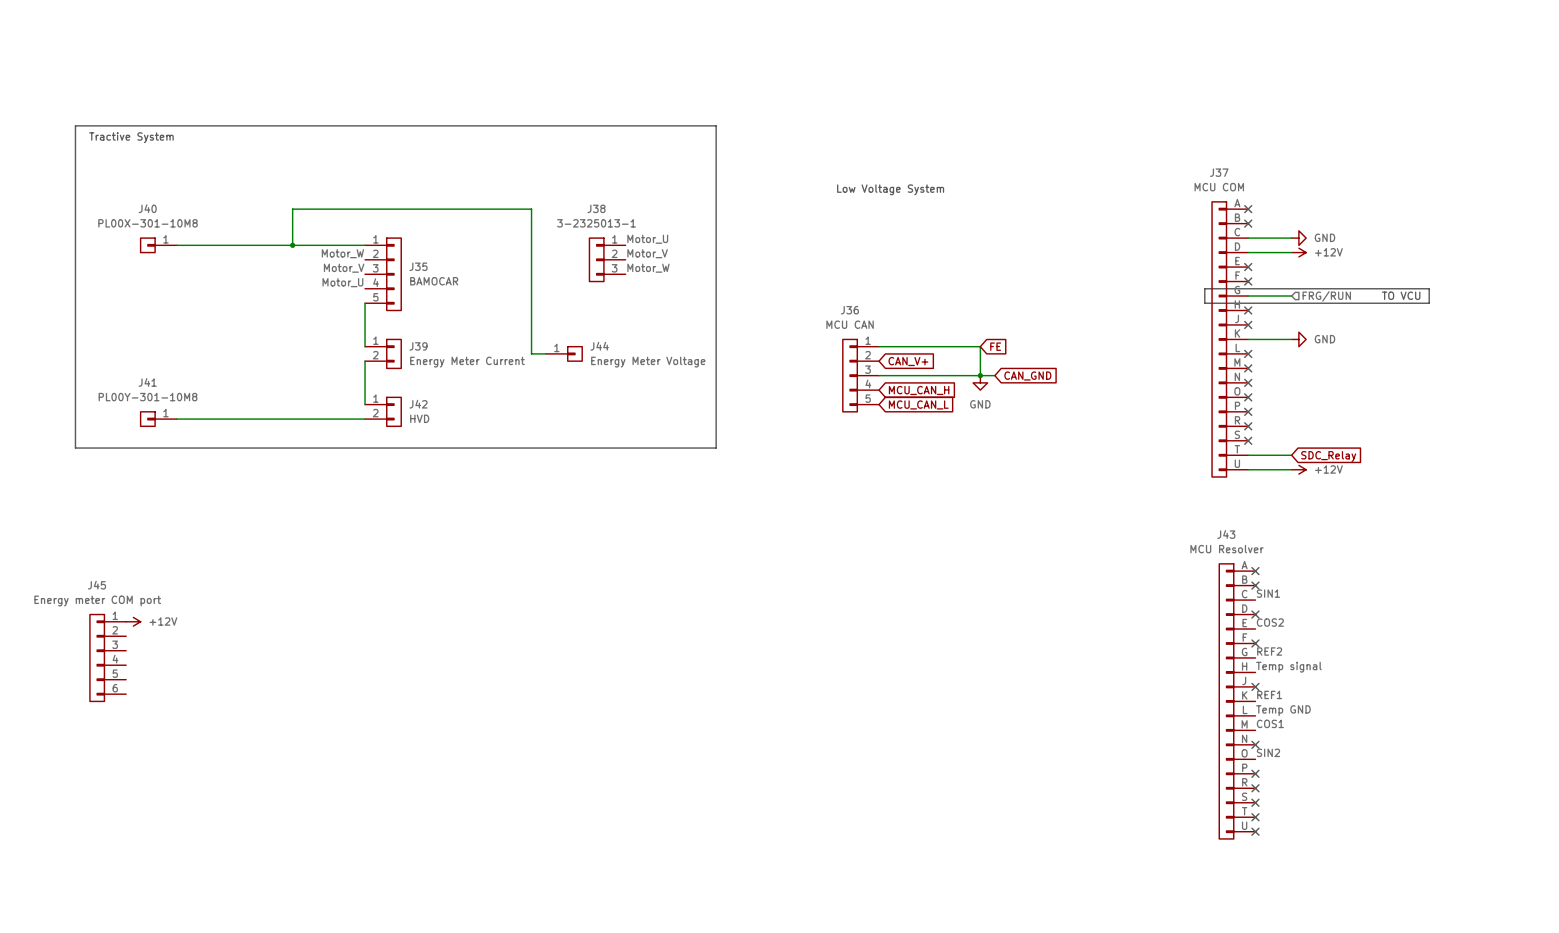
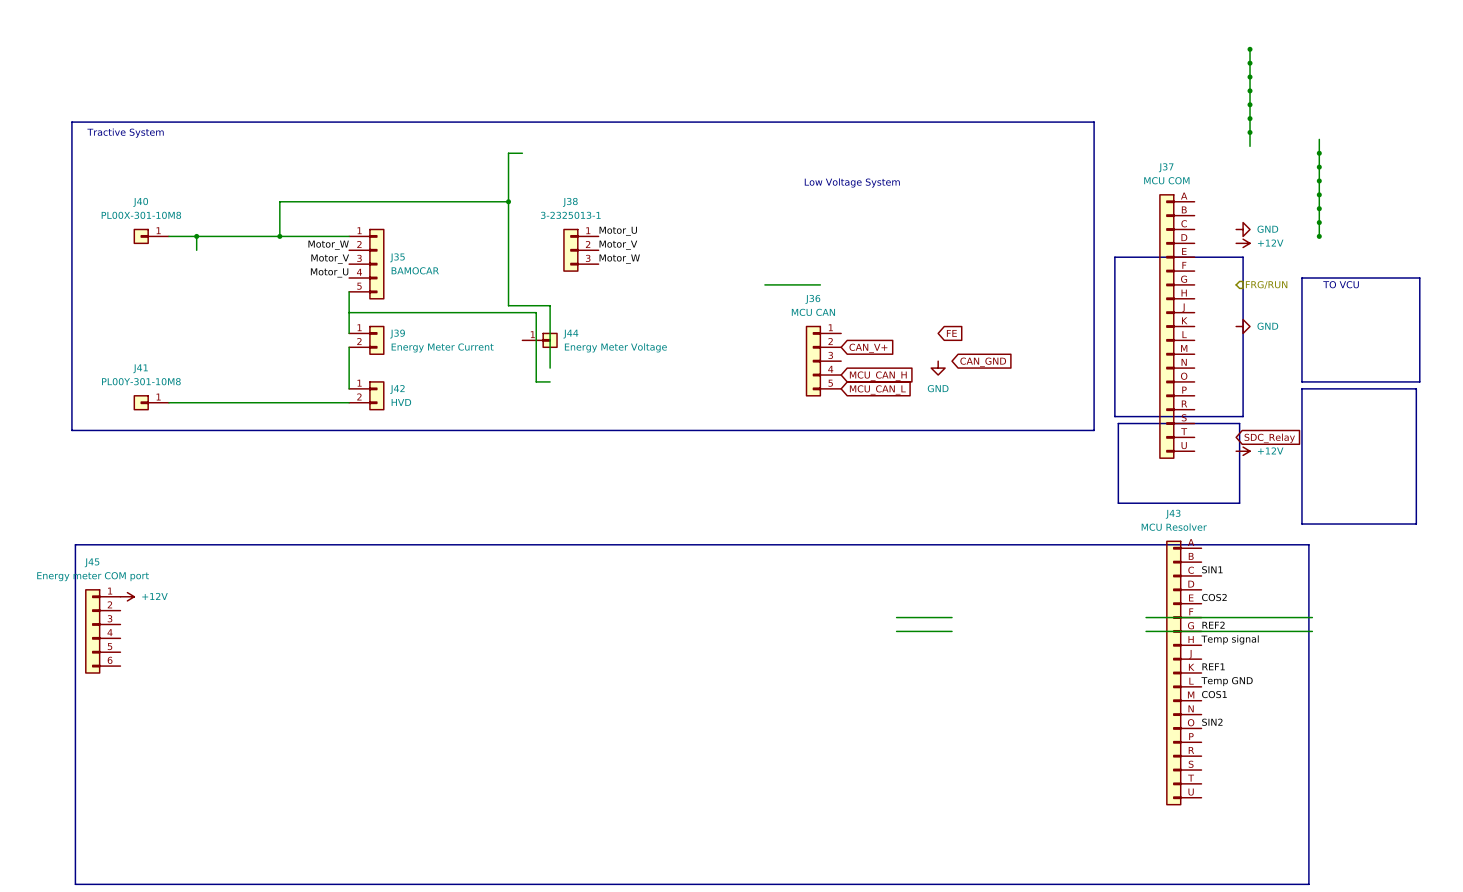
wire: none -> (1250, 49) (1250, 146)
junction: none -> (1250, 49)
junction: none -> (1250, 63)
junction: none -> (1250, 77)
junction: none -> (1250, 90)
junction: none -> (1250, 104)
junction: none -> (1250, 118)
line: (716, 125) (716, 448) -> (685, 122) (1094, 122) (1094, 430) (685, 430)
junction: none -> (1250, 132)
wire: none -> (1319, 139) (1319, 236)
wire: none -> (522, 153) (508, 153) (508, 201)
junction: none -> (1319, 153)
junction: none -> (1319, 167)
junction: none -> (1319, 180)
junction: none -> (1319, 194)
junction: none -> (508, 201)
no-connect mark: (1248, 209) -> none
junction: none -> (1319, 208)
no-connect mark: (1248, 223) -> none
junction: none -> (1319, 222)
wire: (1248, 238) (1291, 238) -> none
wire: none -> (196, 236) (196, 250)
junction: none -> (196, 236)
junction: none -> (1319, 236)
wire: (1248, 252) (1291, 252) -> none
line: none -> (1114, 257) (1243, 257) (1243, 416) (1114, 416) (1114, 257)
no-connect mark: (1248, 267) -> none
no-connect mark: (1248, 281) -> none
line: (1360, 288) (1204, 288) (1204, 303) (1429, 303) (1429, 288) -> (1301, 278) (1301, 381) (1419, 381) (1419, 278) (1367, 278)
wire: none -> (764, 284) (820, 284)
wire: (1248, 296) (1291, 296) -> none
no-connect mark: (1248, 310) -> none
wire: (531, 317) (531, 353) (546, 353) -> (508, 305) (550, 305) (550, 368)
wire: none -> (349, 312) (536, 312) (536, 381) (550, 381)
no-connect mark: (1248, 324) -> none
wire: (1248, 339) (1291, 339) -> none
wire: (879, 346) (980, 346) (980, 375) -> none
no-connect mark: (1248, 353) -> none
no-connect mark: (1248, 368) -> none
wire: (879, 375) (994, 375) -> none
junction: (980, 375) -> none
no-connect mark: (1248, 382) -> none
no-connect mark: (1248, 397) -> none
line: none -> (1301, 388) (1301, 524) (1416, 524) (1416, 388) (1301, 388)
no-connect mark: (1248, 411) -> none
no-connect mark: (1248, 426) -> none
line: none -> (1118, 423) (1239, 423) (1239, 503) (1118, 503) (1118, 423)
no-connect mark: (1248, 440) -> none
wire: (1248, 455) (1291, 455) -> none
wire: (1248, 469) (1291, 469) -> none
line: none -> (75, 544) (1308, 544) (1308, 884) (75, 884) (75, 544)
no-connect mark: (1255, 571) -> none
no-connect mark: (1255, 585) -> none
no-connect mark: (1255, 614) -> none
wire: none -> (896, 617) (952, 617)
wire: none -> (1146, 617) (1312, 617)
no-connect mark: (1255, 643) -> none
wire: none -> (896, 631) (952, 631)
wire: none -> (1146, 631) (1312, 631)
no-connect mark: (1255, 686) -> none
no-connect mark: (1255, 744) -> none
no-connect mark: (1255, 773) -> none
no-connect mark: (1255, 788) -> none
no-connect mark: (1255, 802) -> none
no-connect mark: (1255, 817) -> none
no-connect mark: (1255, 831) -> none

